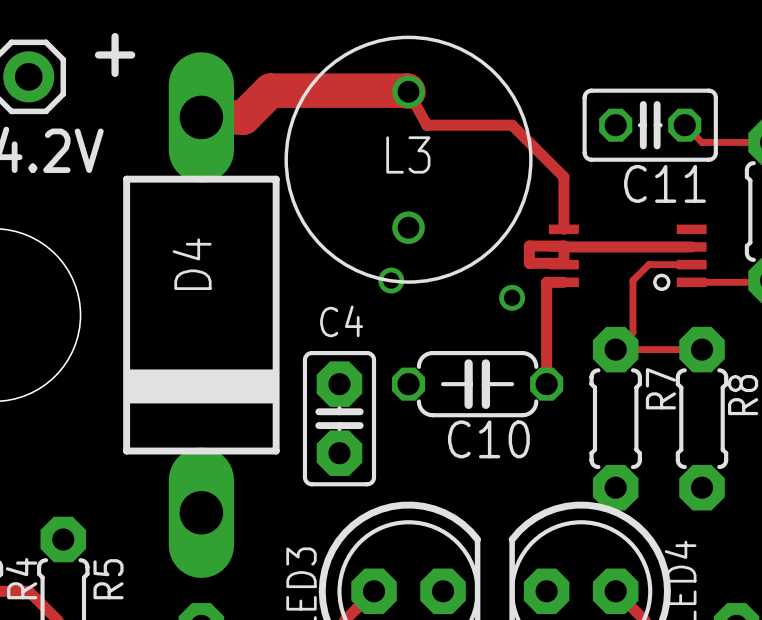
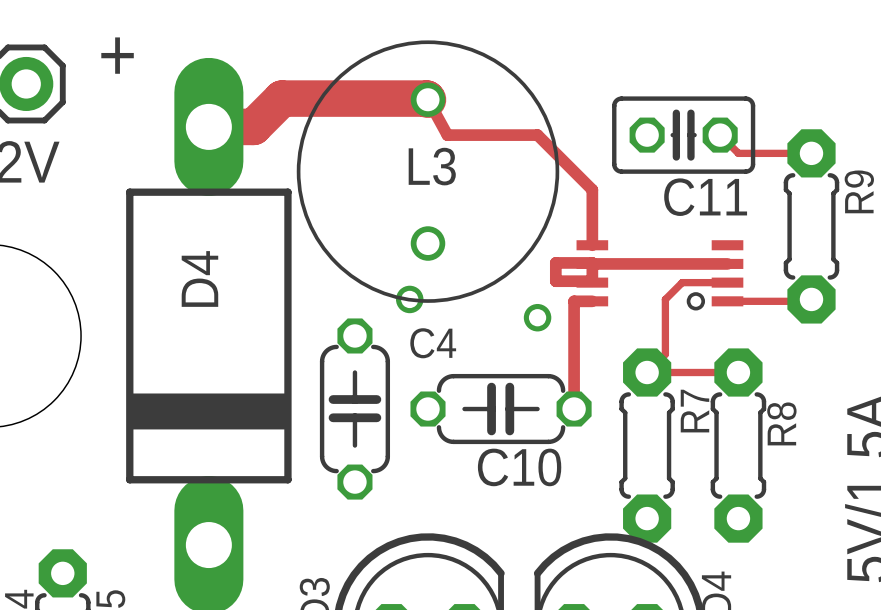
C4 name position: C4 (341, 321) -> C4 (433, 343)
C4 footprint: [302, 351, 377, 487] -> [319, 318, 391, 500]

